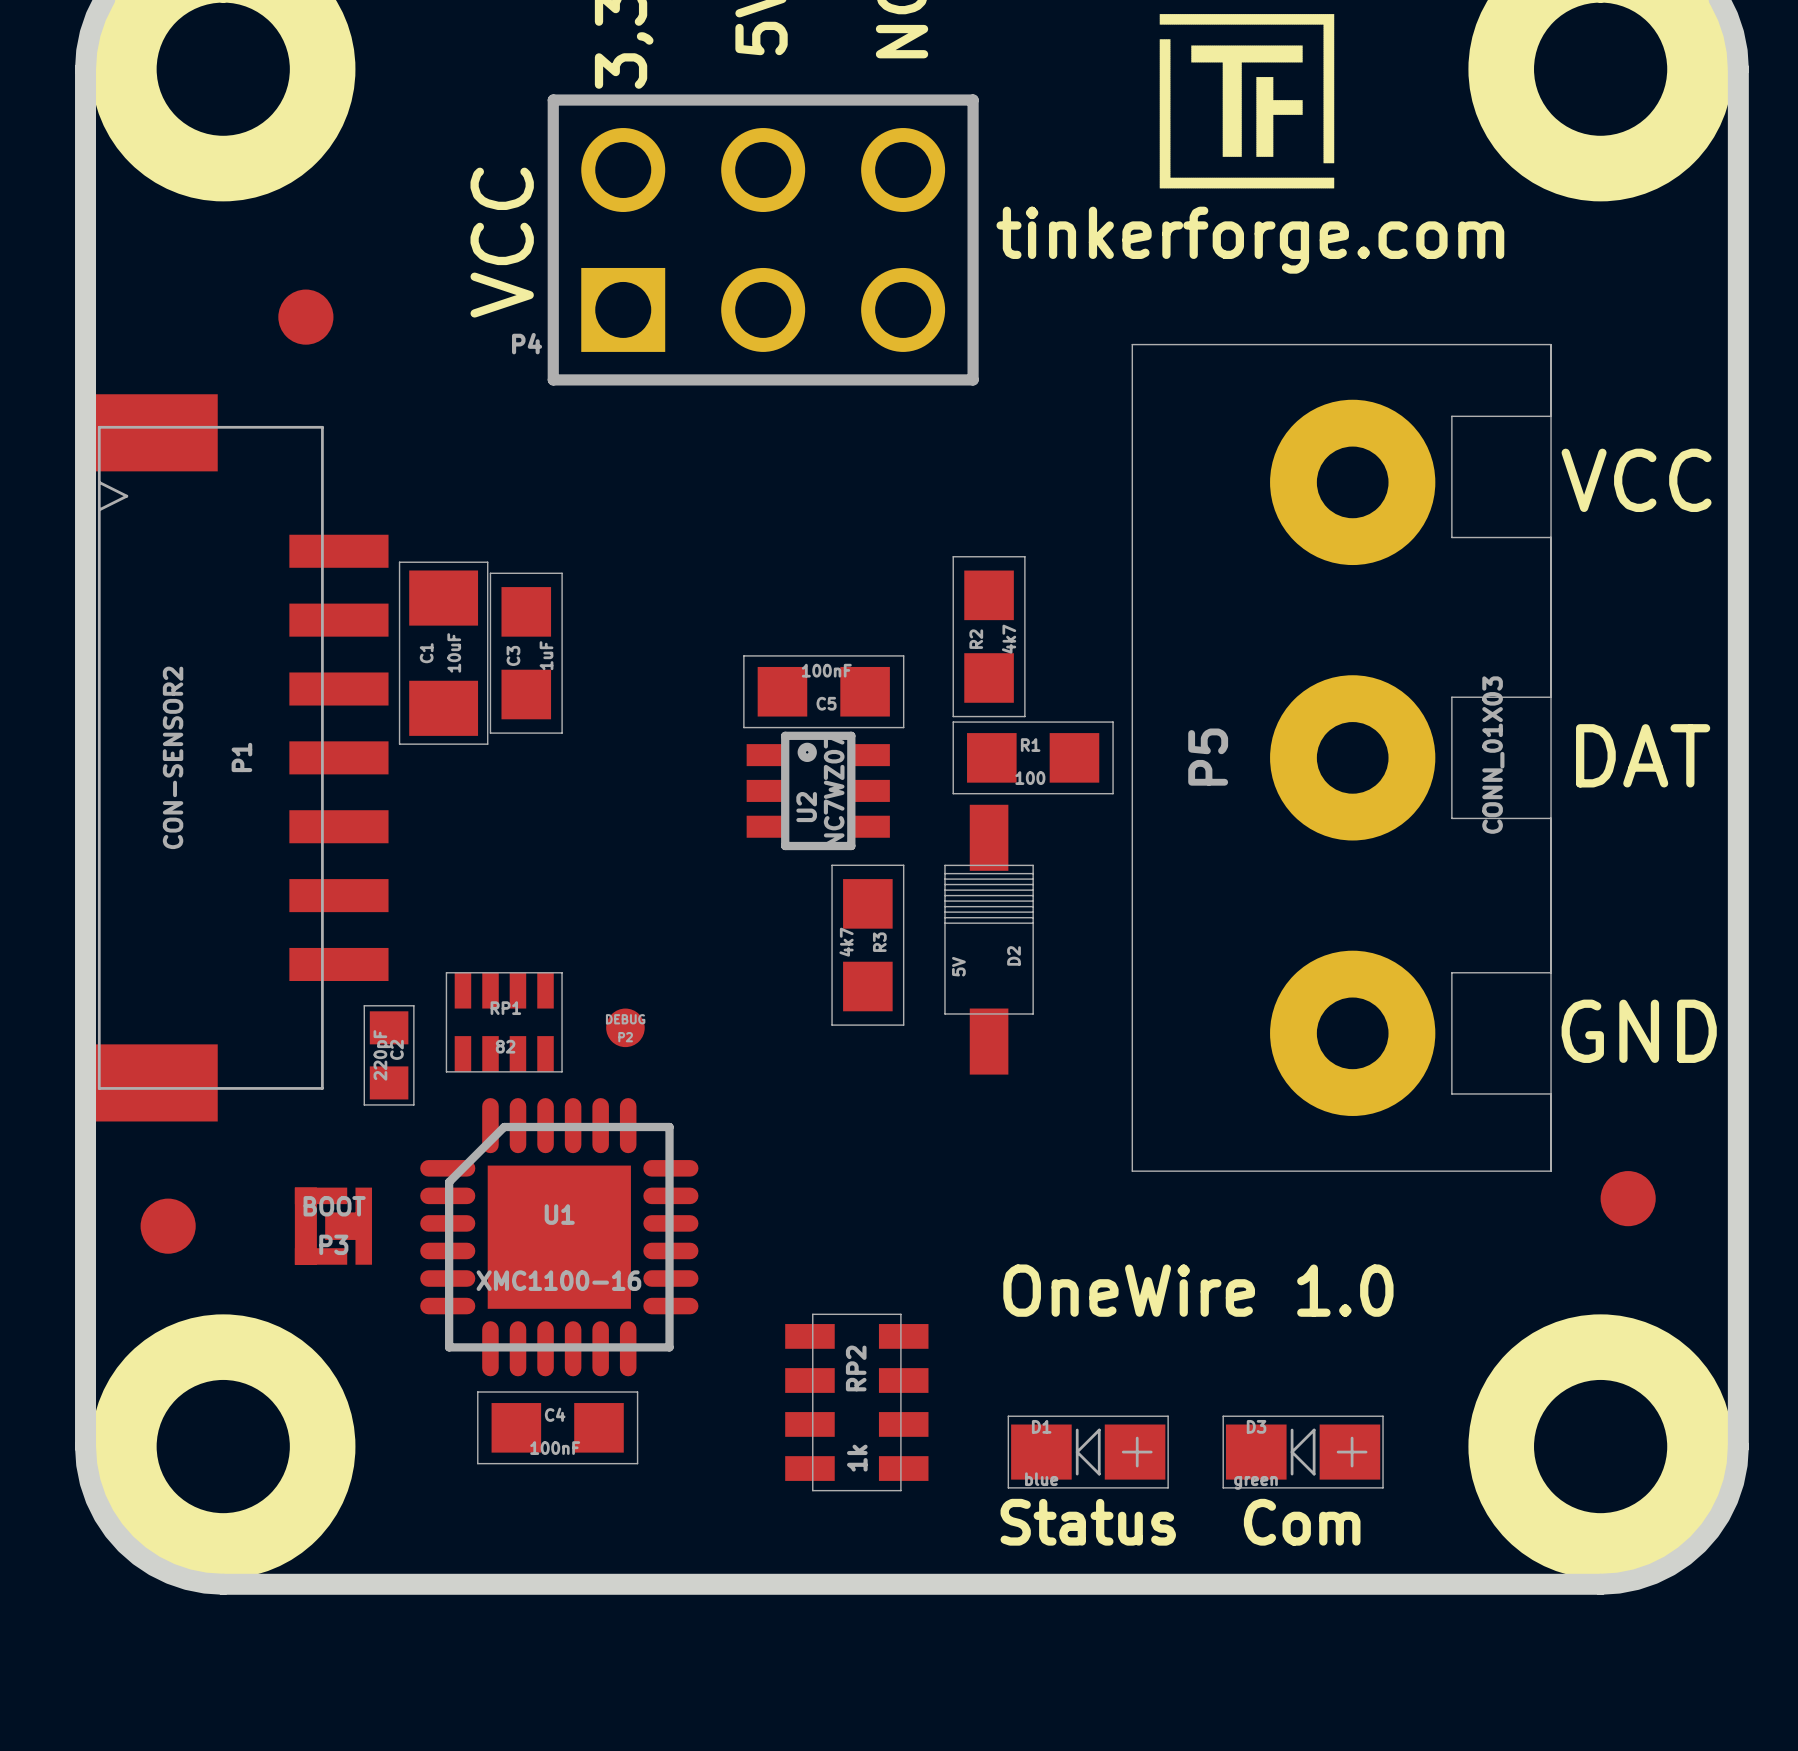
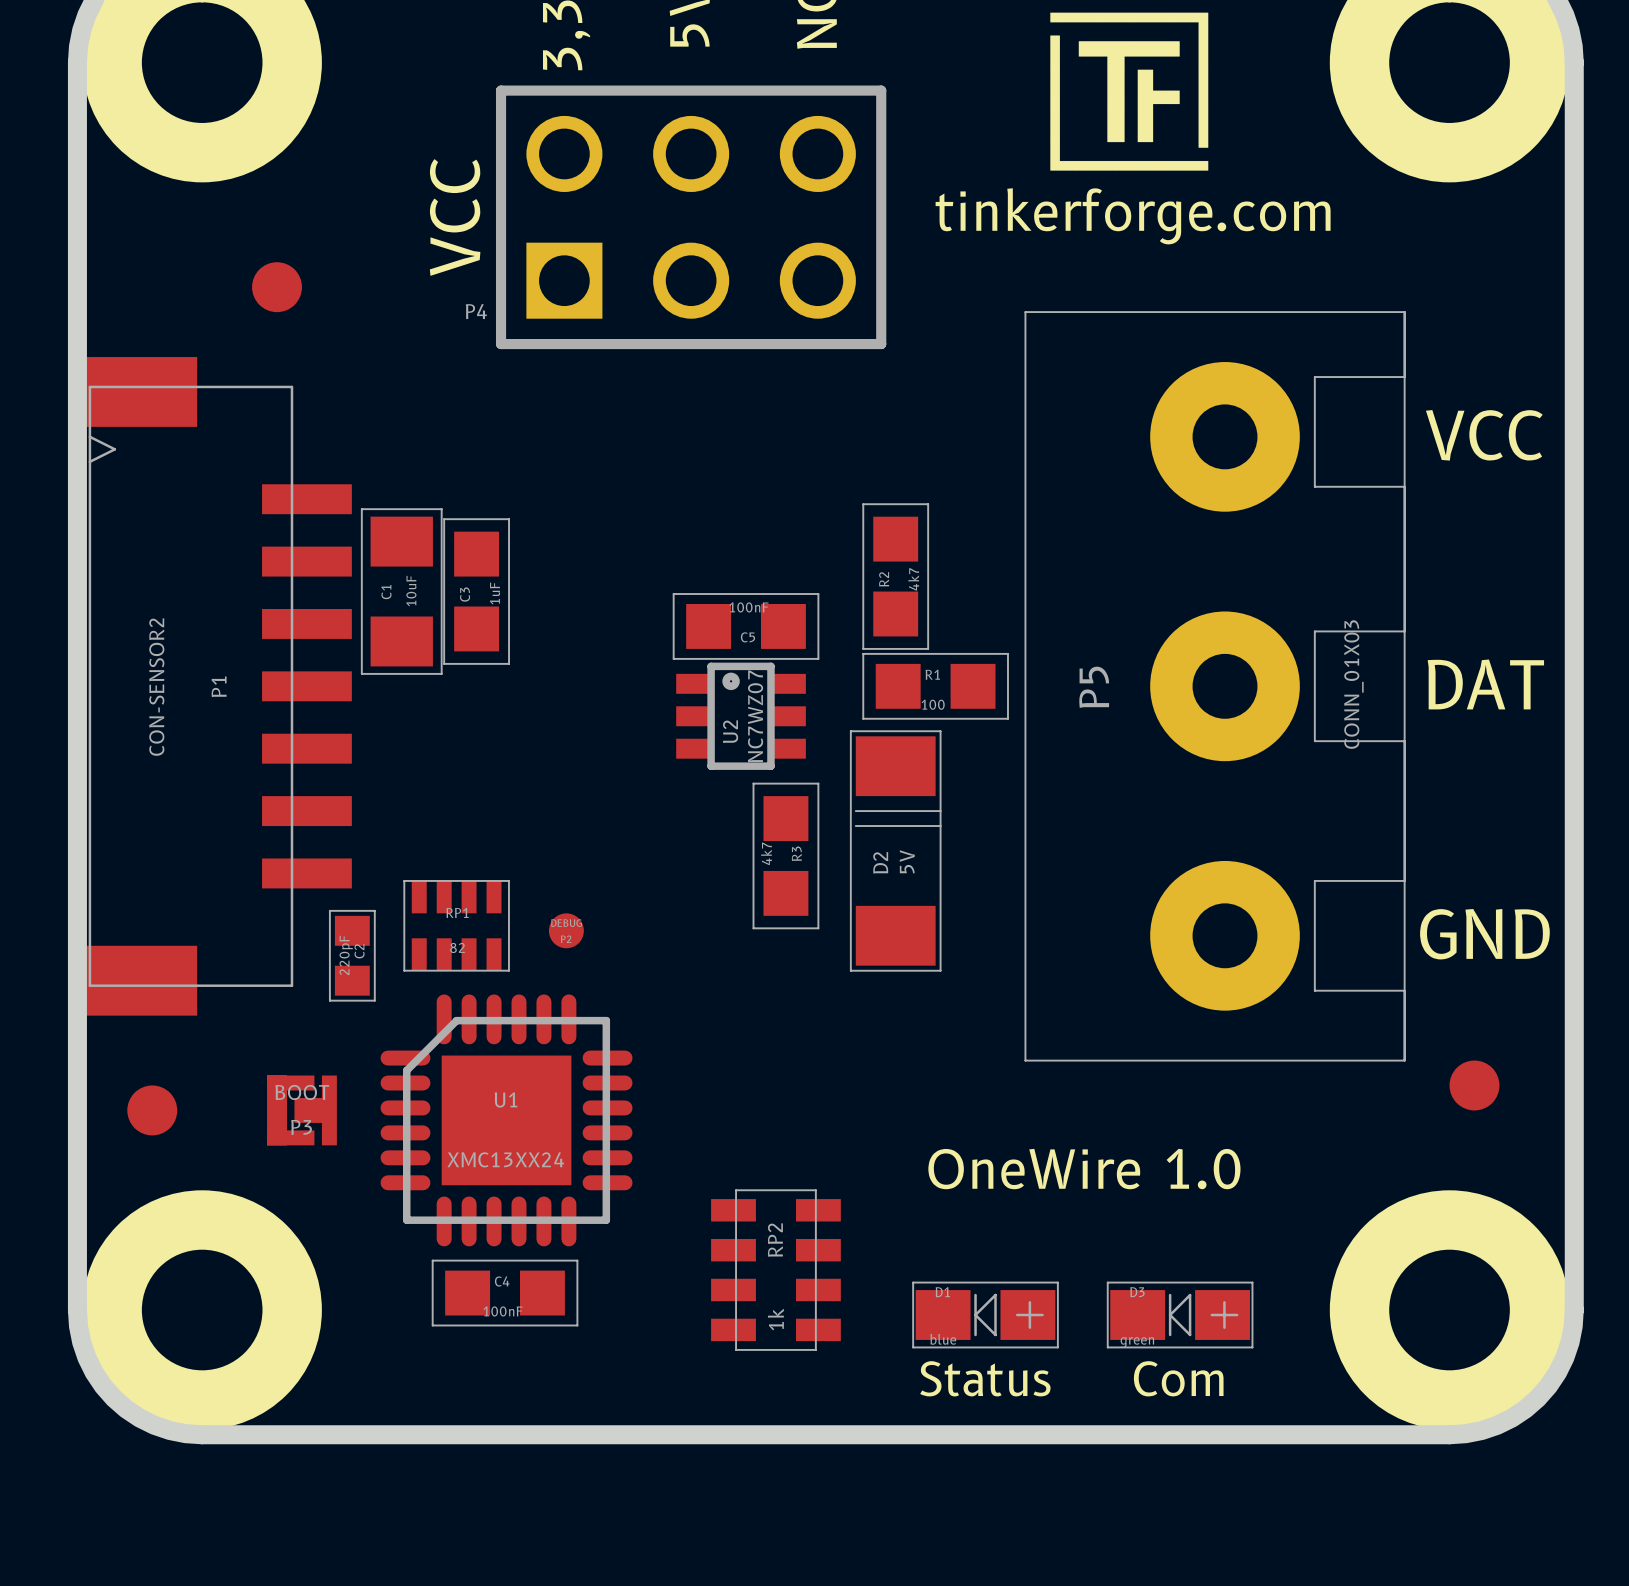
D2 footprint: [944, 804, 1034, 1075] -> [850, 731, 941, 971]
U1 value: XMC1100-16 (558, 1280) -> XMC13XX24 (505, 1159)

